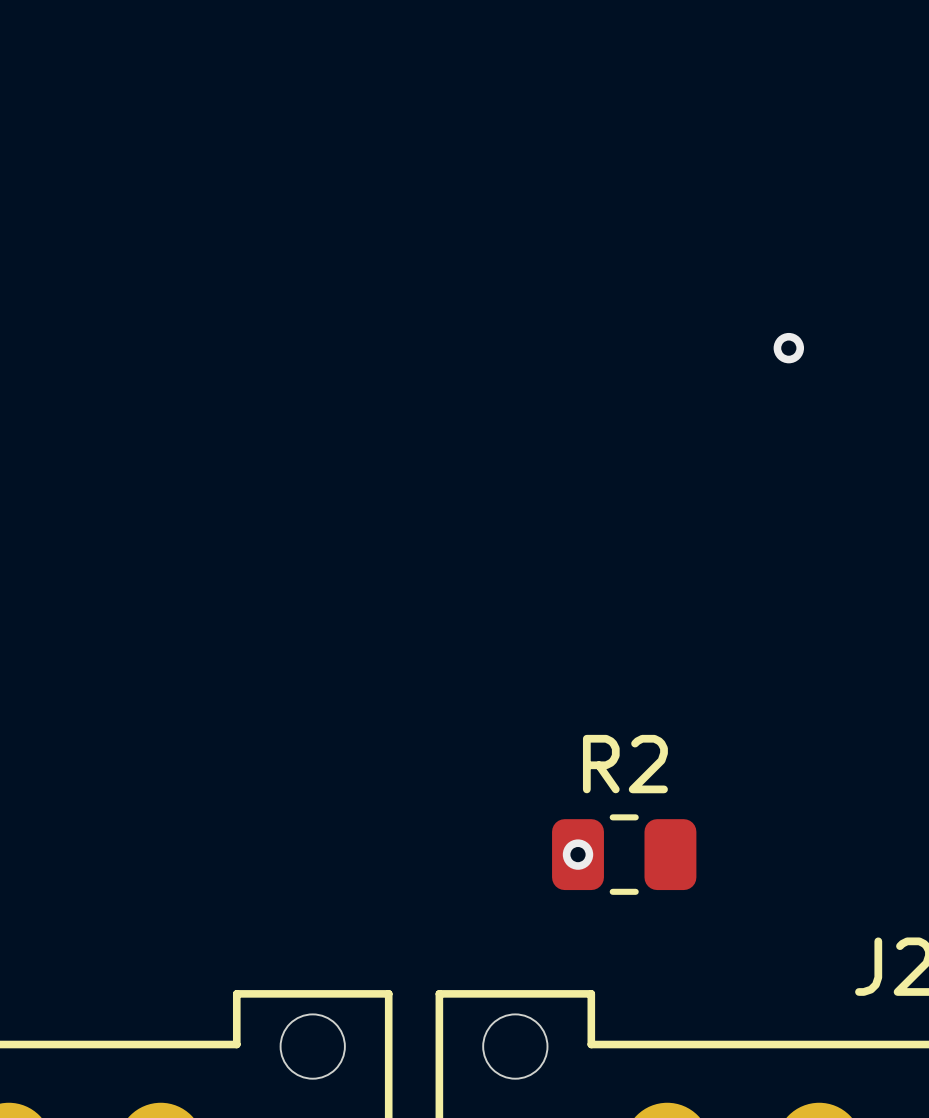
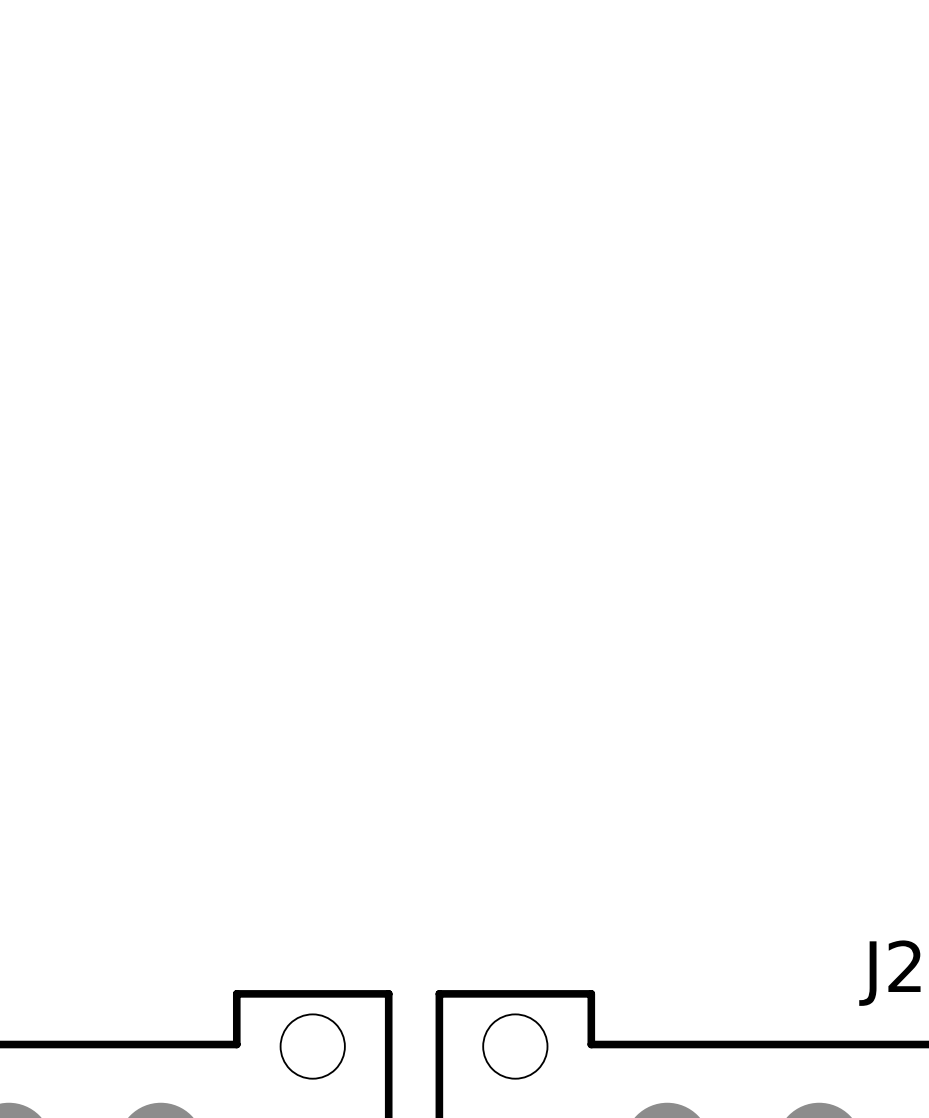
via: (788, 348) -> none
via: (578, 854) -> none
R2: (624, 854) -> none

